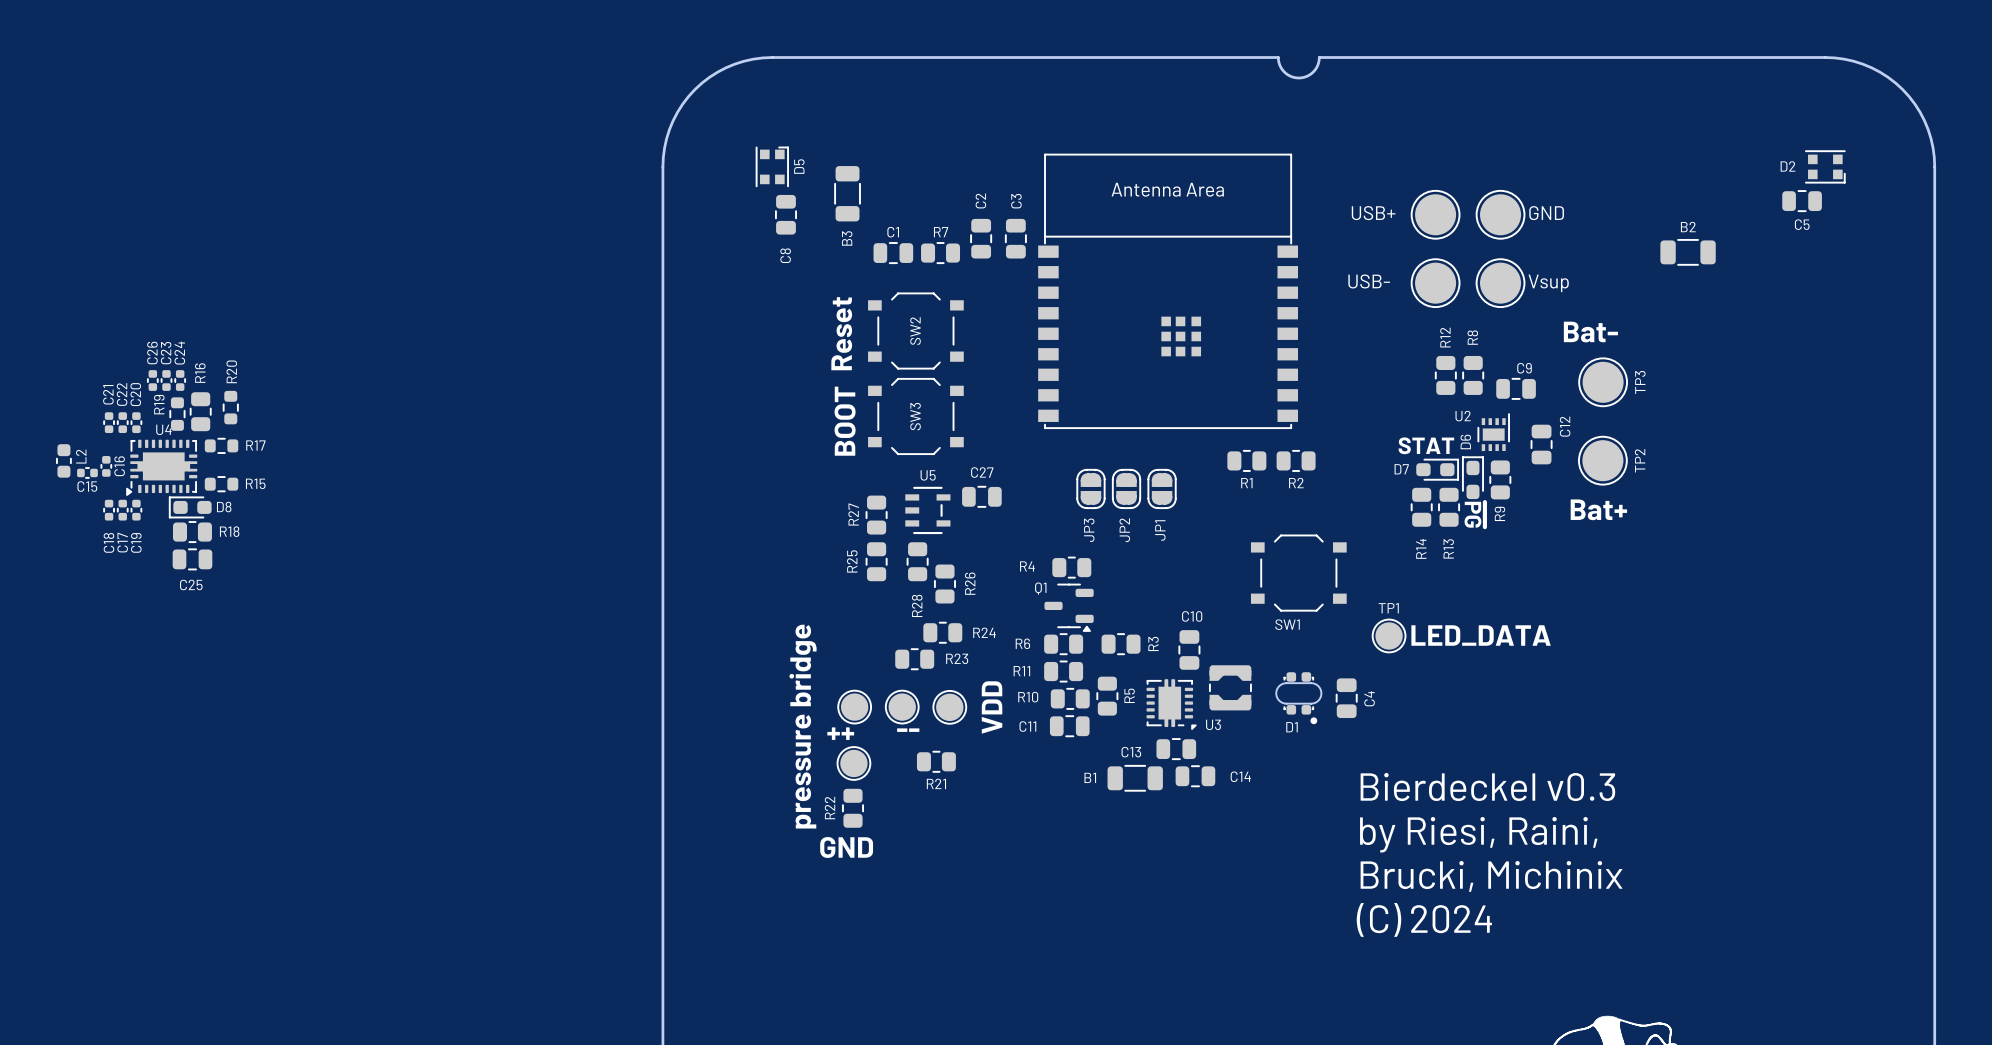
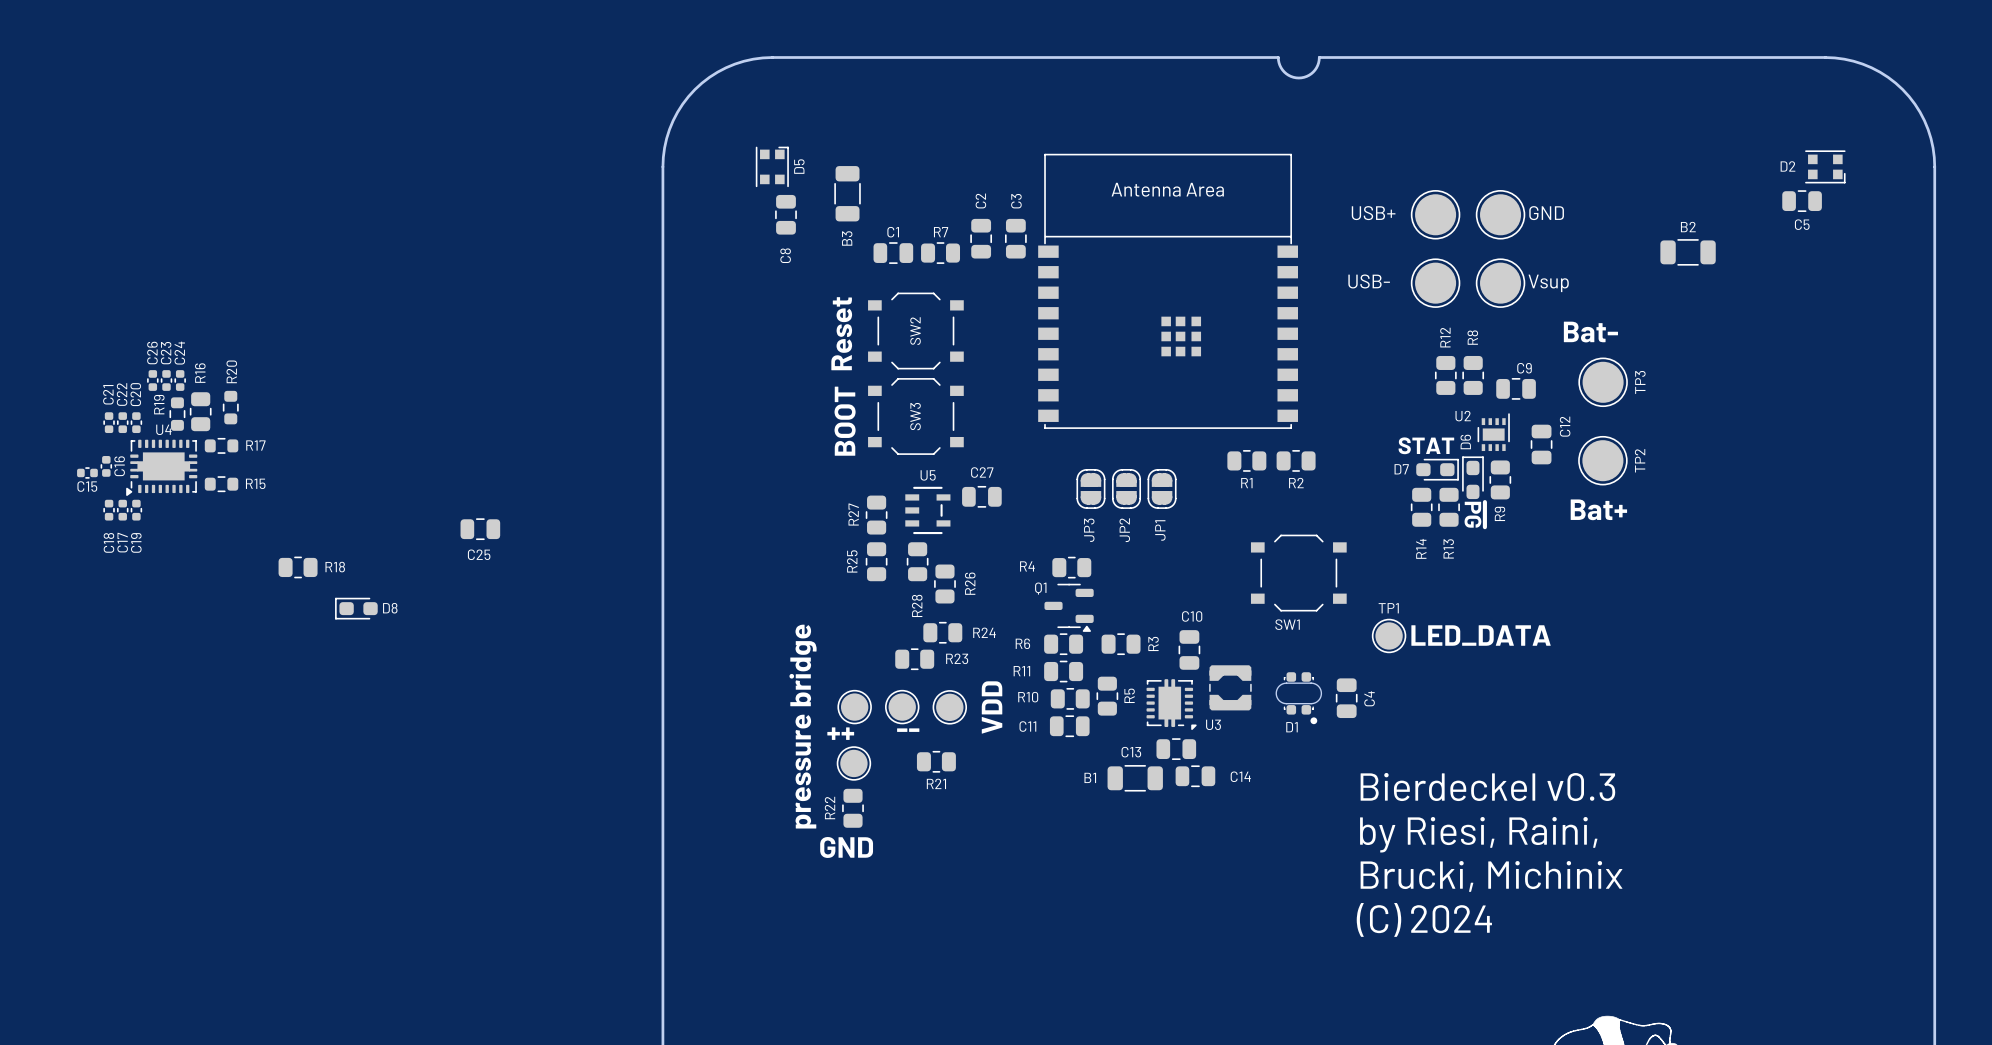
L2: (63, 460) -> none
D8 position: (190, 507) -> (356, 608)
R18 position: (192, 532) -> (298, 567)
C25 position: (192, 559) -> (480, 529)

